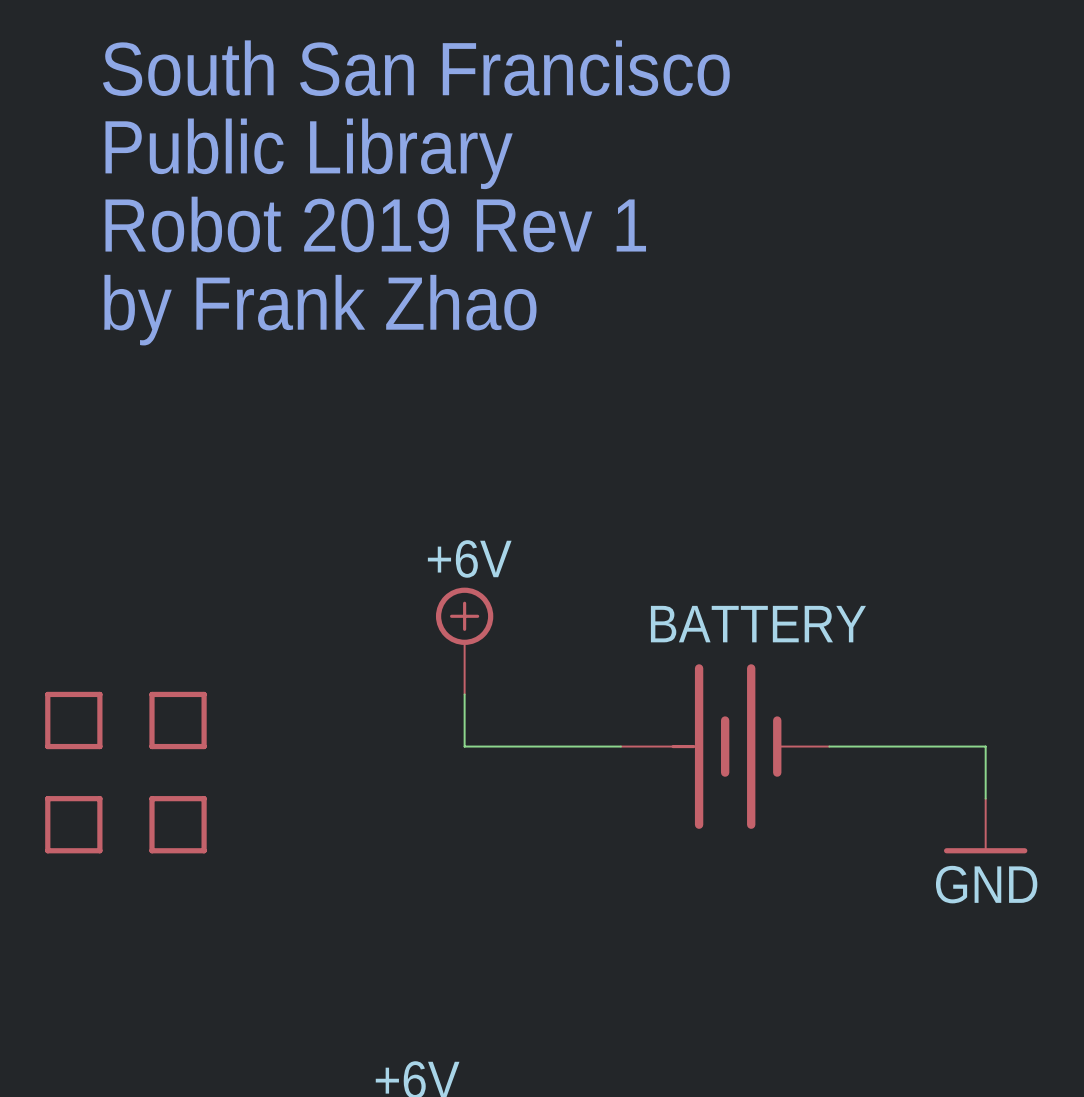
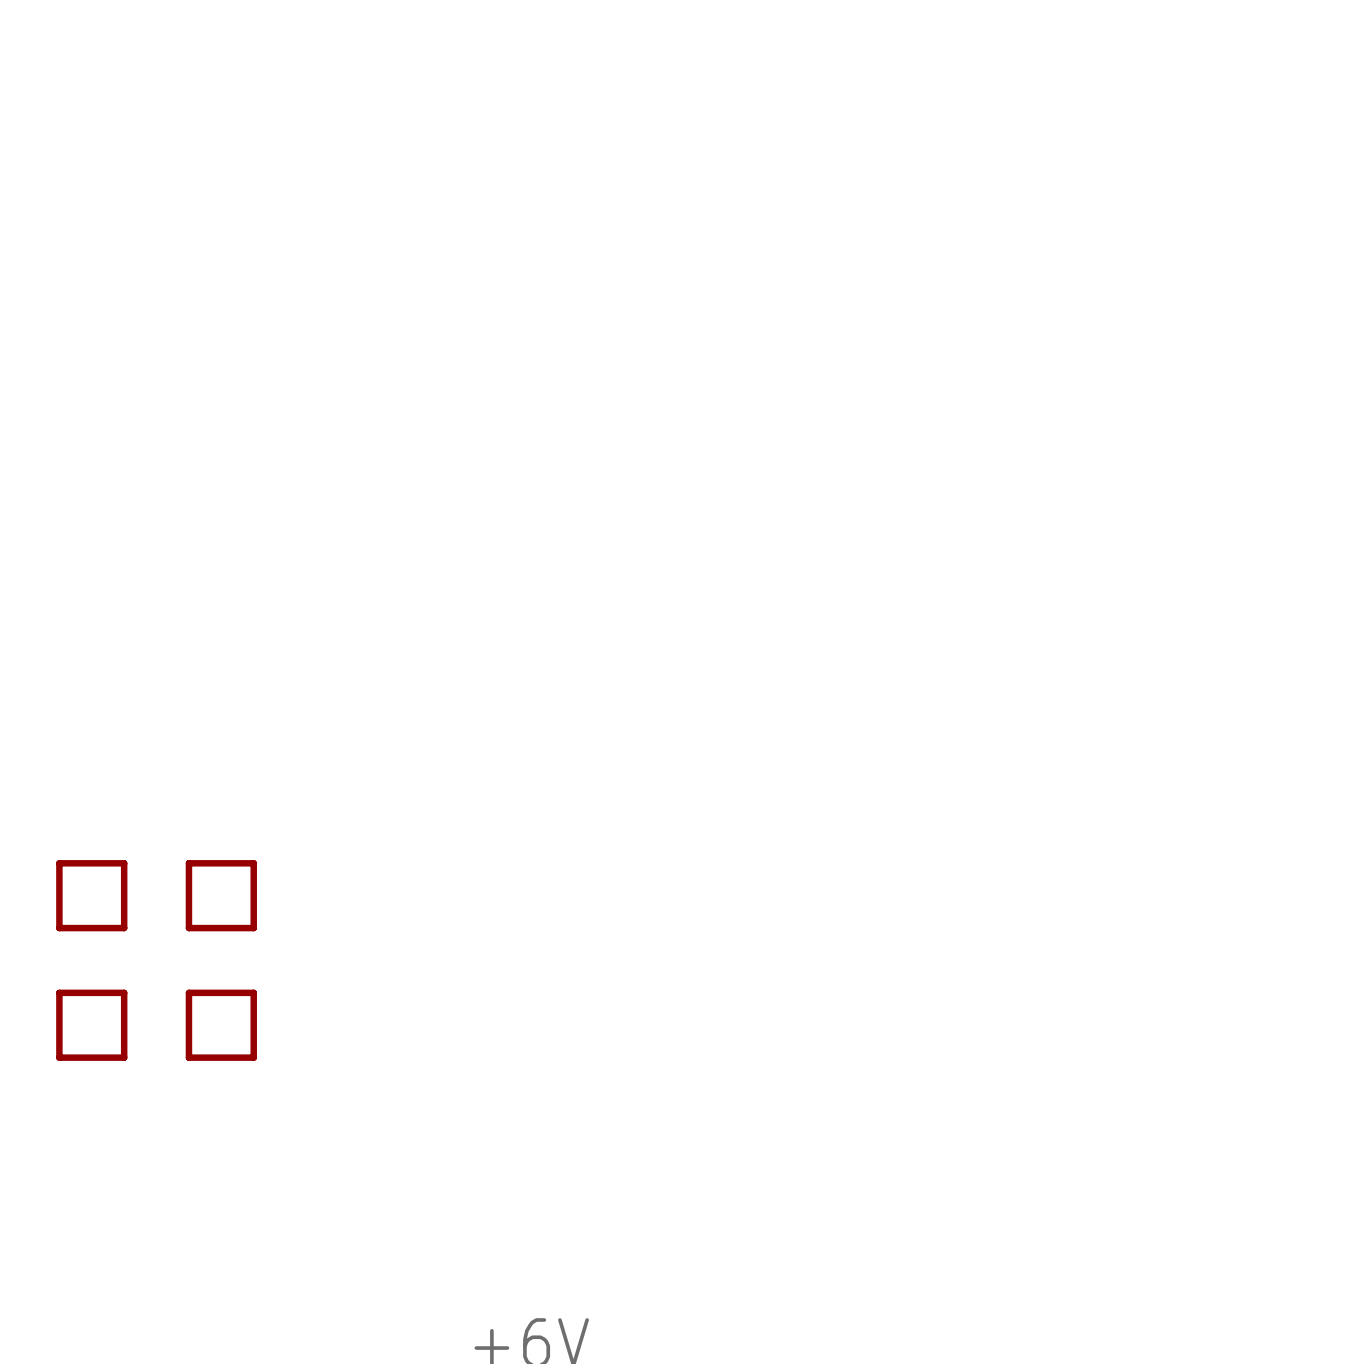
part: (416, 192) -> none
power symbol: +6V (464, 641) -> none
wire: (464, 694) (464, 746) (620, 746) -> none
BATTERY: (725, 746) -> none
wire: (829, 746) (985, 746) (985, 798) -> none
power symbol: GND (985, 826) -> none

